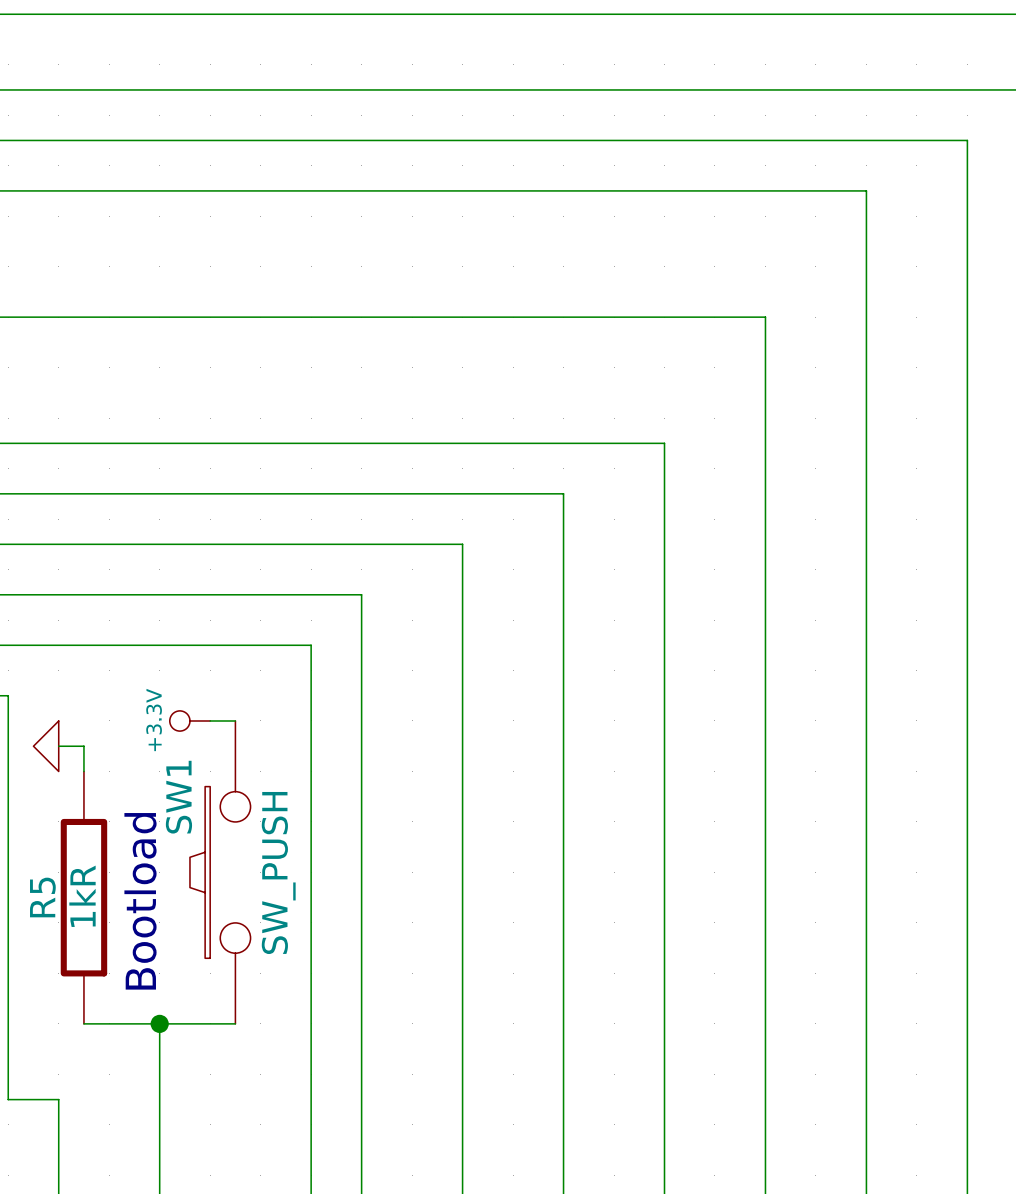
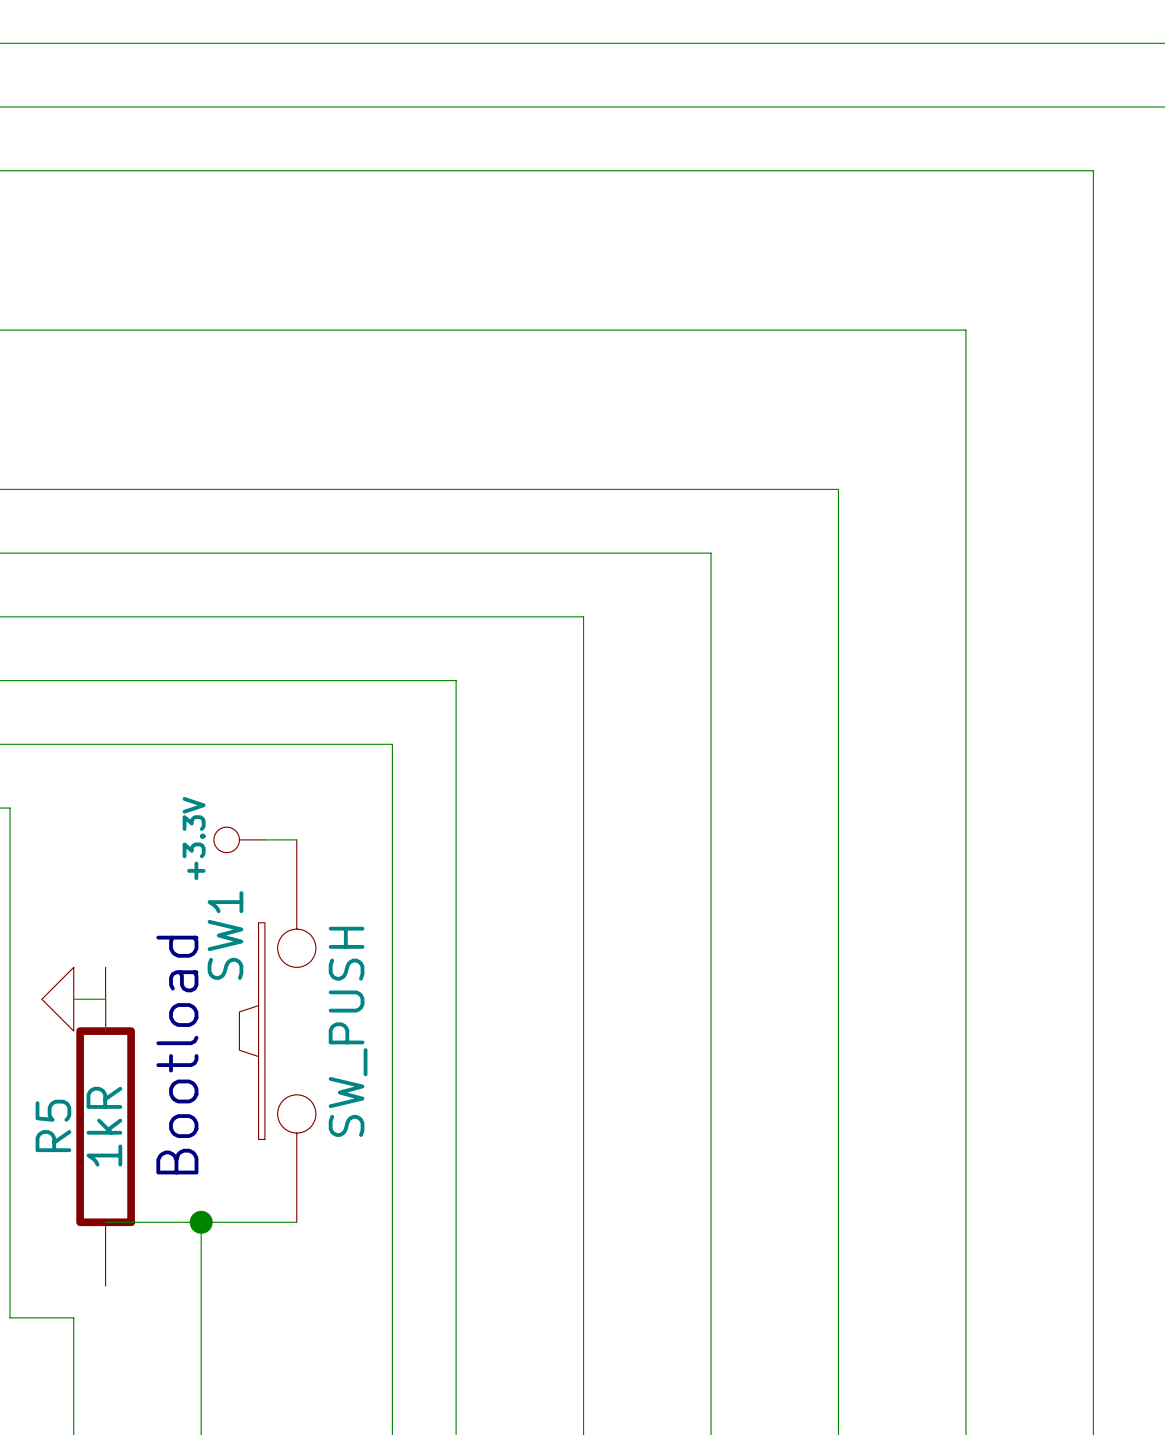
power symbol position: (46, 746) -> (57, 999)
wire: (58, 746) (83, 746) (83, 771) -> (73, 999) (105, 999) (105, 1031)
R5 position: (83, 897) -> (105, 1126)

